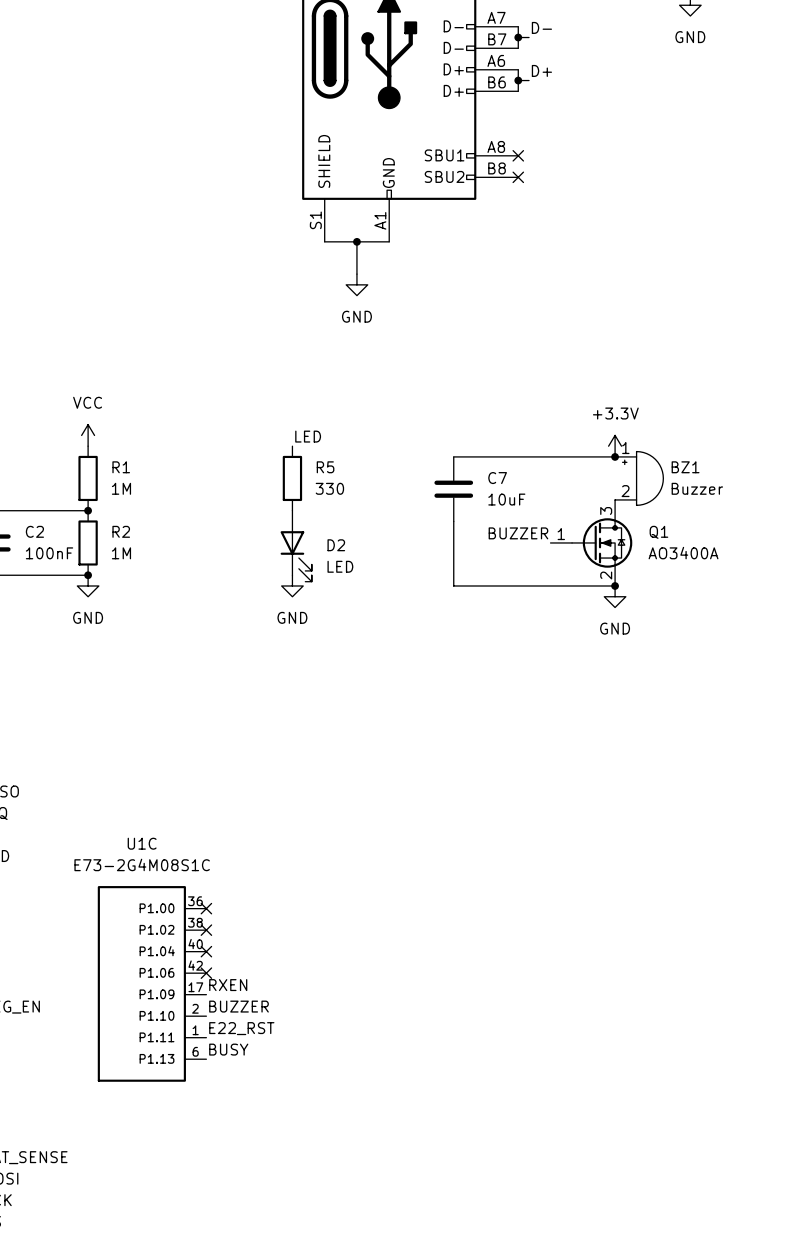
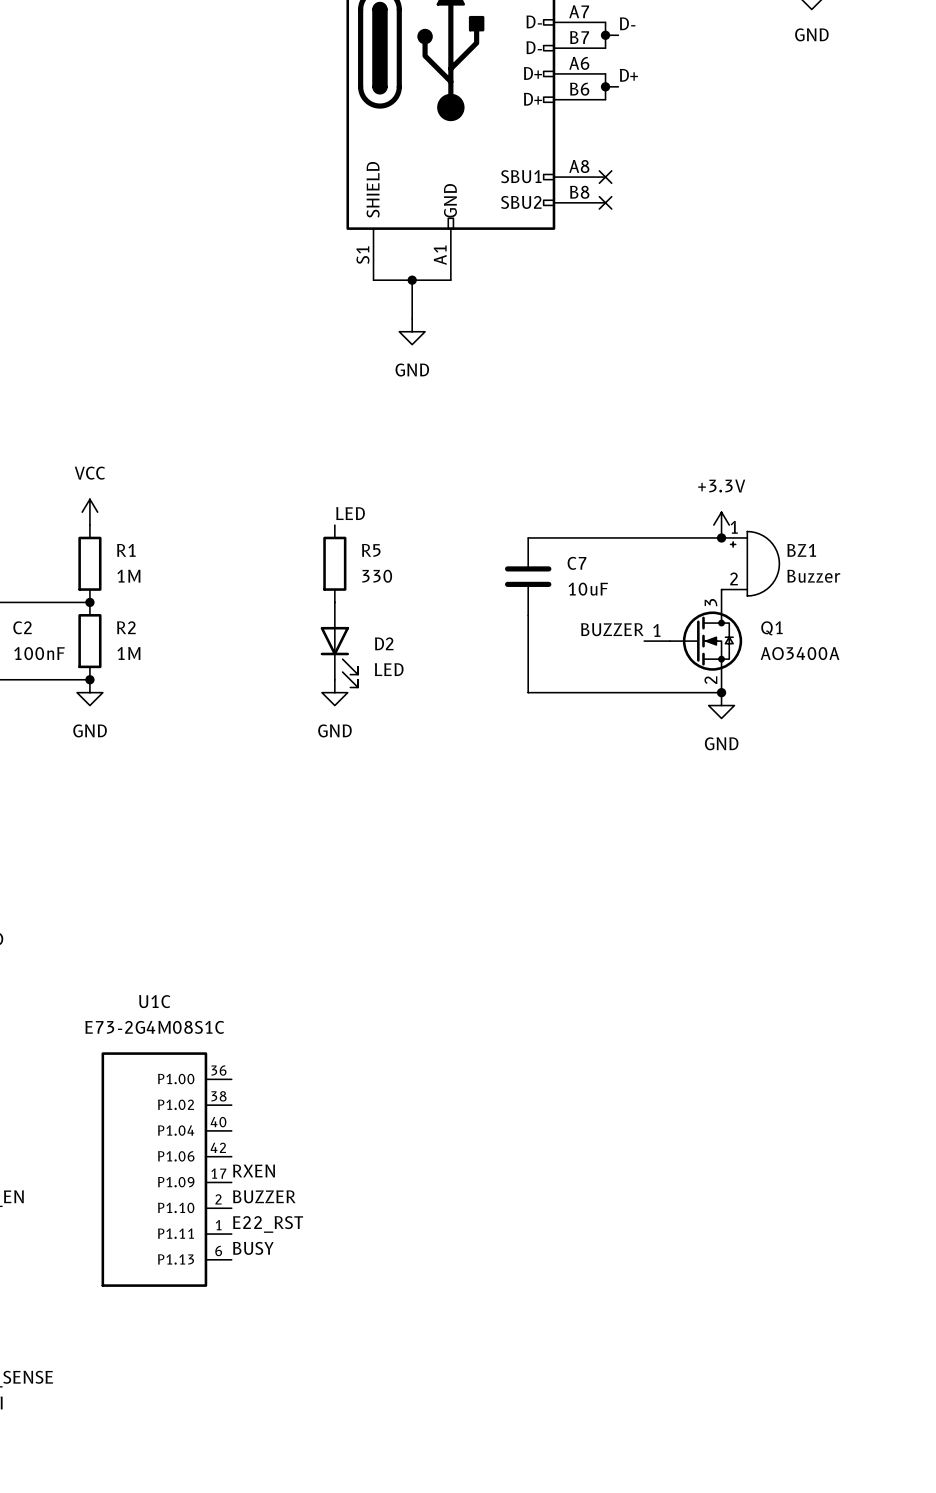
no-connect mark: (206, 908) -> none
no-connect mark: (206, 930) -> none
no-connect mark: (206, 951) -> none
no-connect mark: (206, 973) -> none

